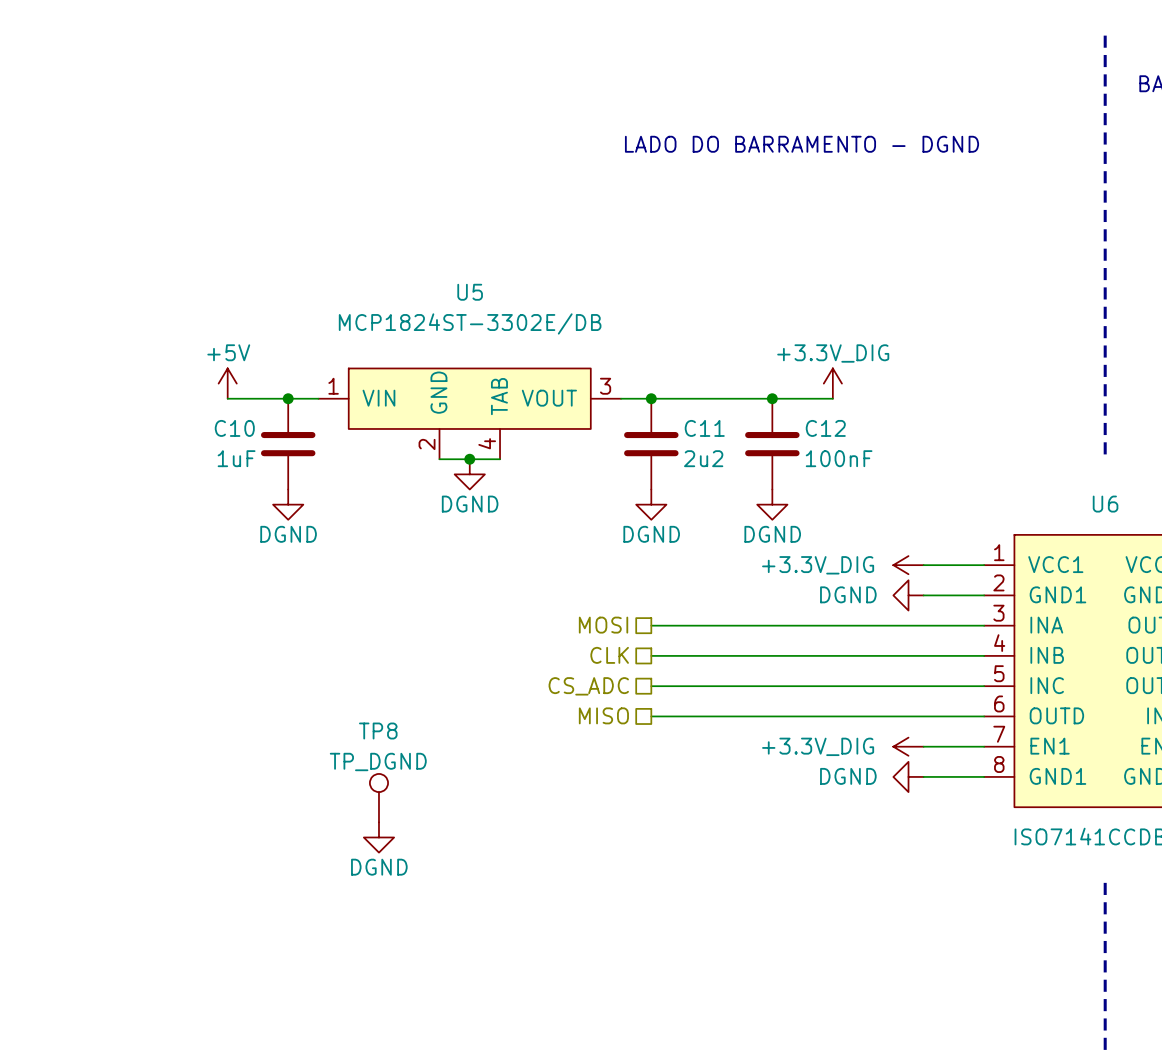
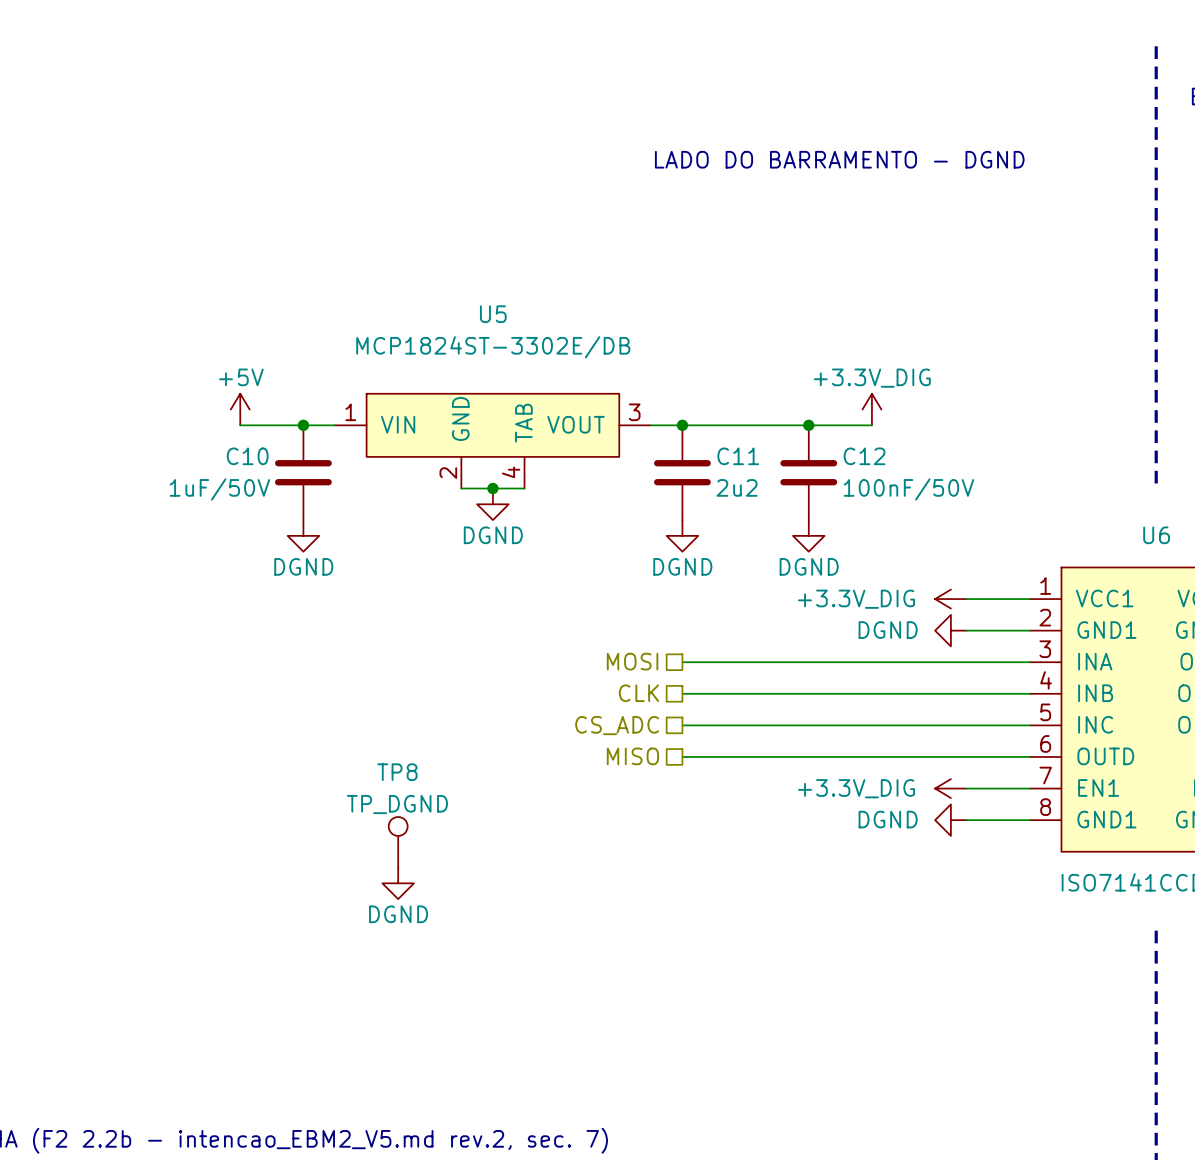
C10 value: 1uF (236, 458) -> 1uF/50V (219, 489)
C12 value: 100nF (839, 458) -> 100nF/50V (908, 489)

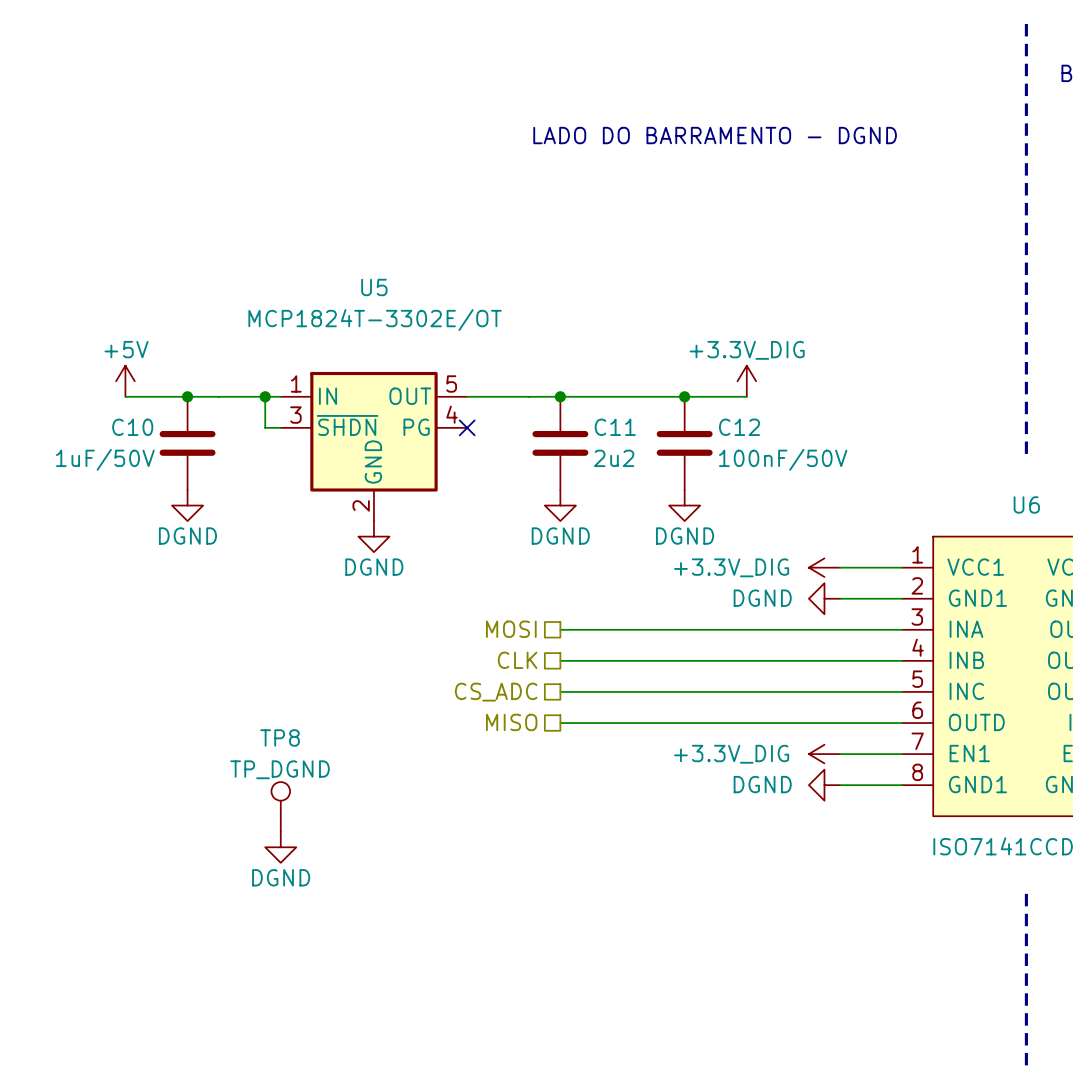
U5 value: MCP1824ST-3302E/DB (493, 347) -> MCP1824T-3302E/OT (375, 320)
U5 symbol: [335, 393, 651, 489] -> [280, 371, 468, 522]
junction: none -> (265, 396)
no-connect mark: none -> (467, 427)
junction: (492, 488) -> none
power symbol position: DGND (492, 504) -> DGND (373, 536)

